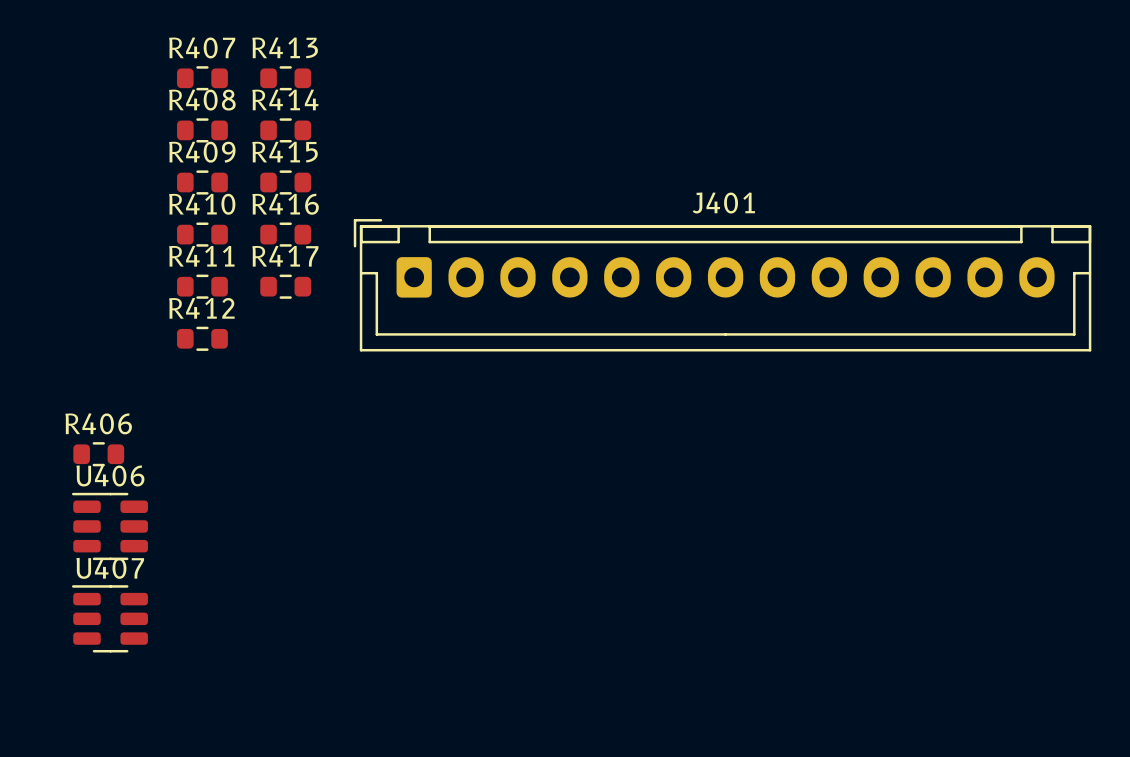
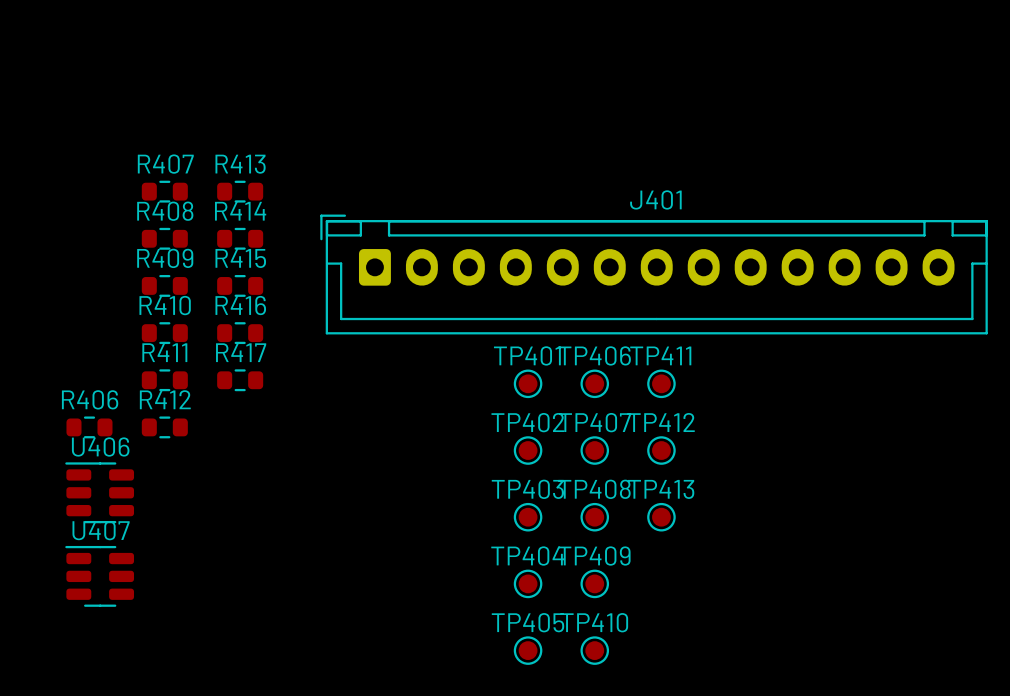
R407 position: (202, 78) -> (164, 191)
R413 position: (285, 78) -> (240, 191)
R408 position: (202, 130) -> (164, 238)
R414 position: (285, 130) -> (240, 238)
R409 position: (202, 182) -> (164, 285)
R415 position: (285, 182) -> (240, 285)
R410 position: (202, 234) -> (164, 333)
R416 position: (285, 234) -> (240, 333)
R411 position: (202, 286) -> (164, 380)
R417 position: (285, 286) -> (240, 380)
R412 position: (202, 338) -> (164, 427)
TP401: none -> (528, 383)
TP406: none -> (594, 383)
TP411: none -> (661, 383)
TP402: none -> (528, 450)
TP407: none -> (594, 450)
TP412: none -> (661, 450)
TP403: none -> (528, 517)
TP408: none -> (594, 517)
TP413: none -> (661, 517)
TP404: none -> (528, 583)
TP409: none -> (594, 583)
TP405: none -> (528, 650)
TP410: none -> (594, 650)

